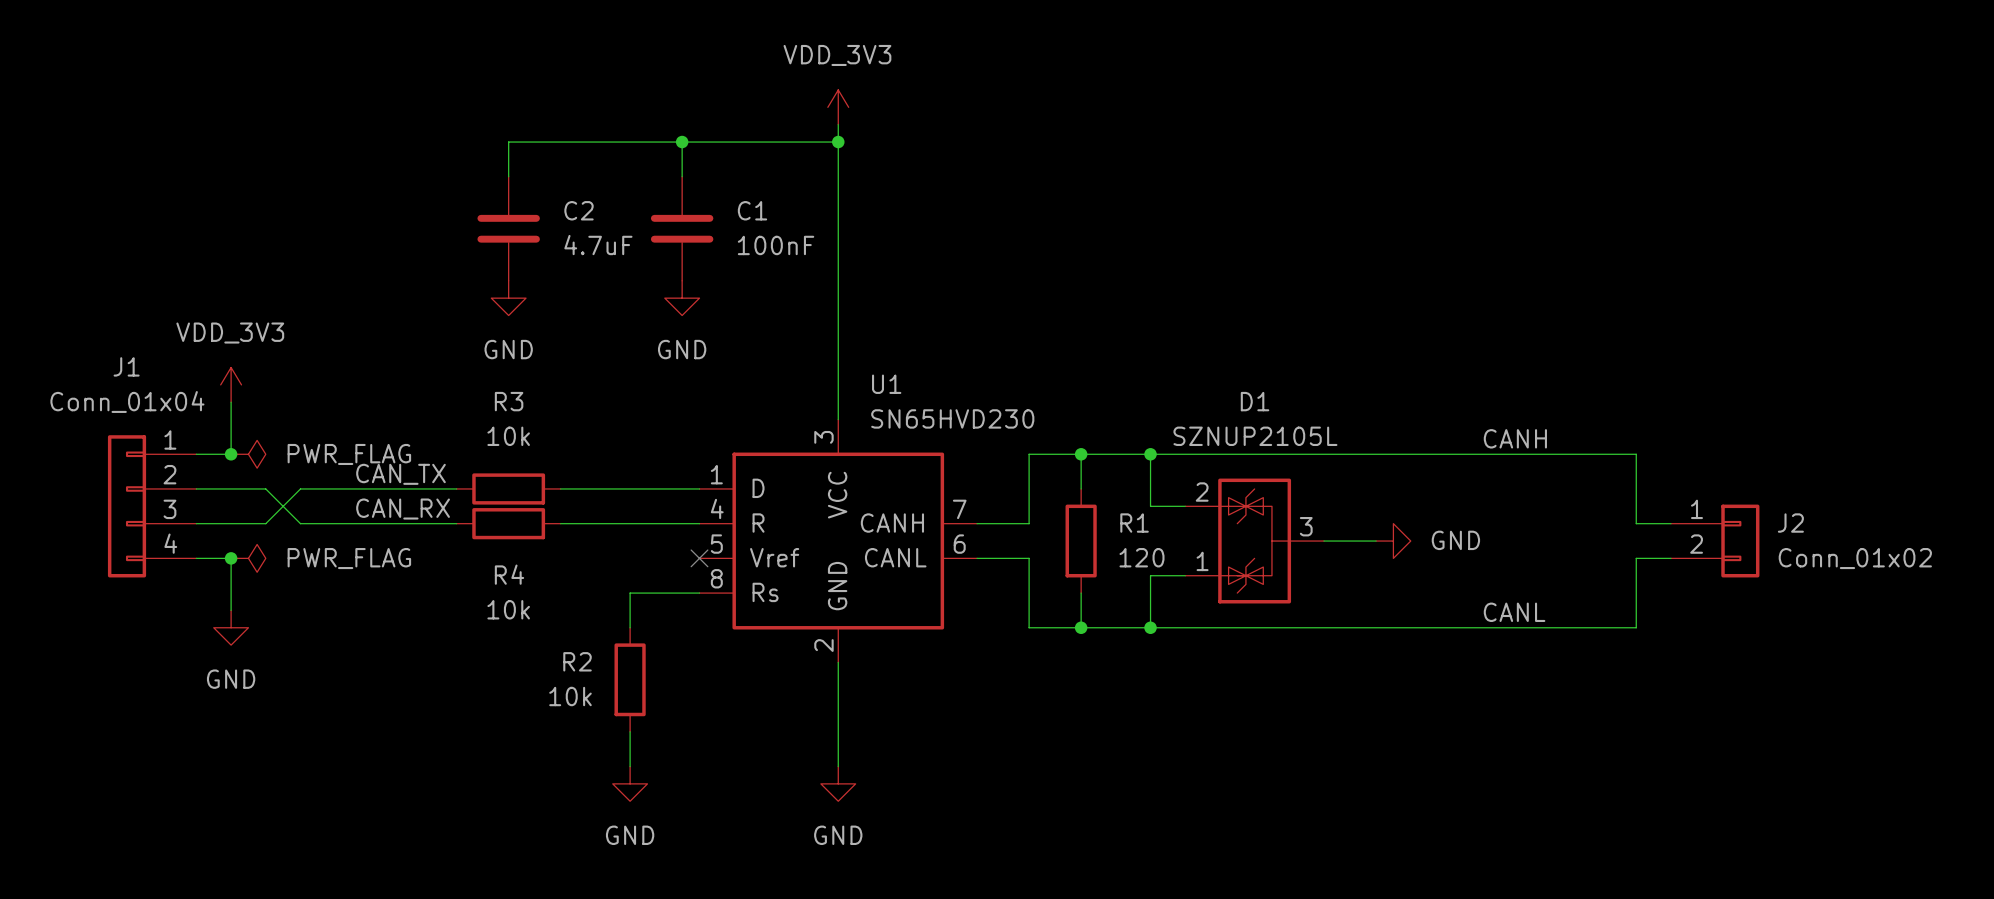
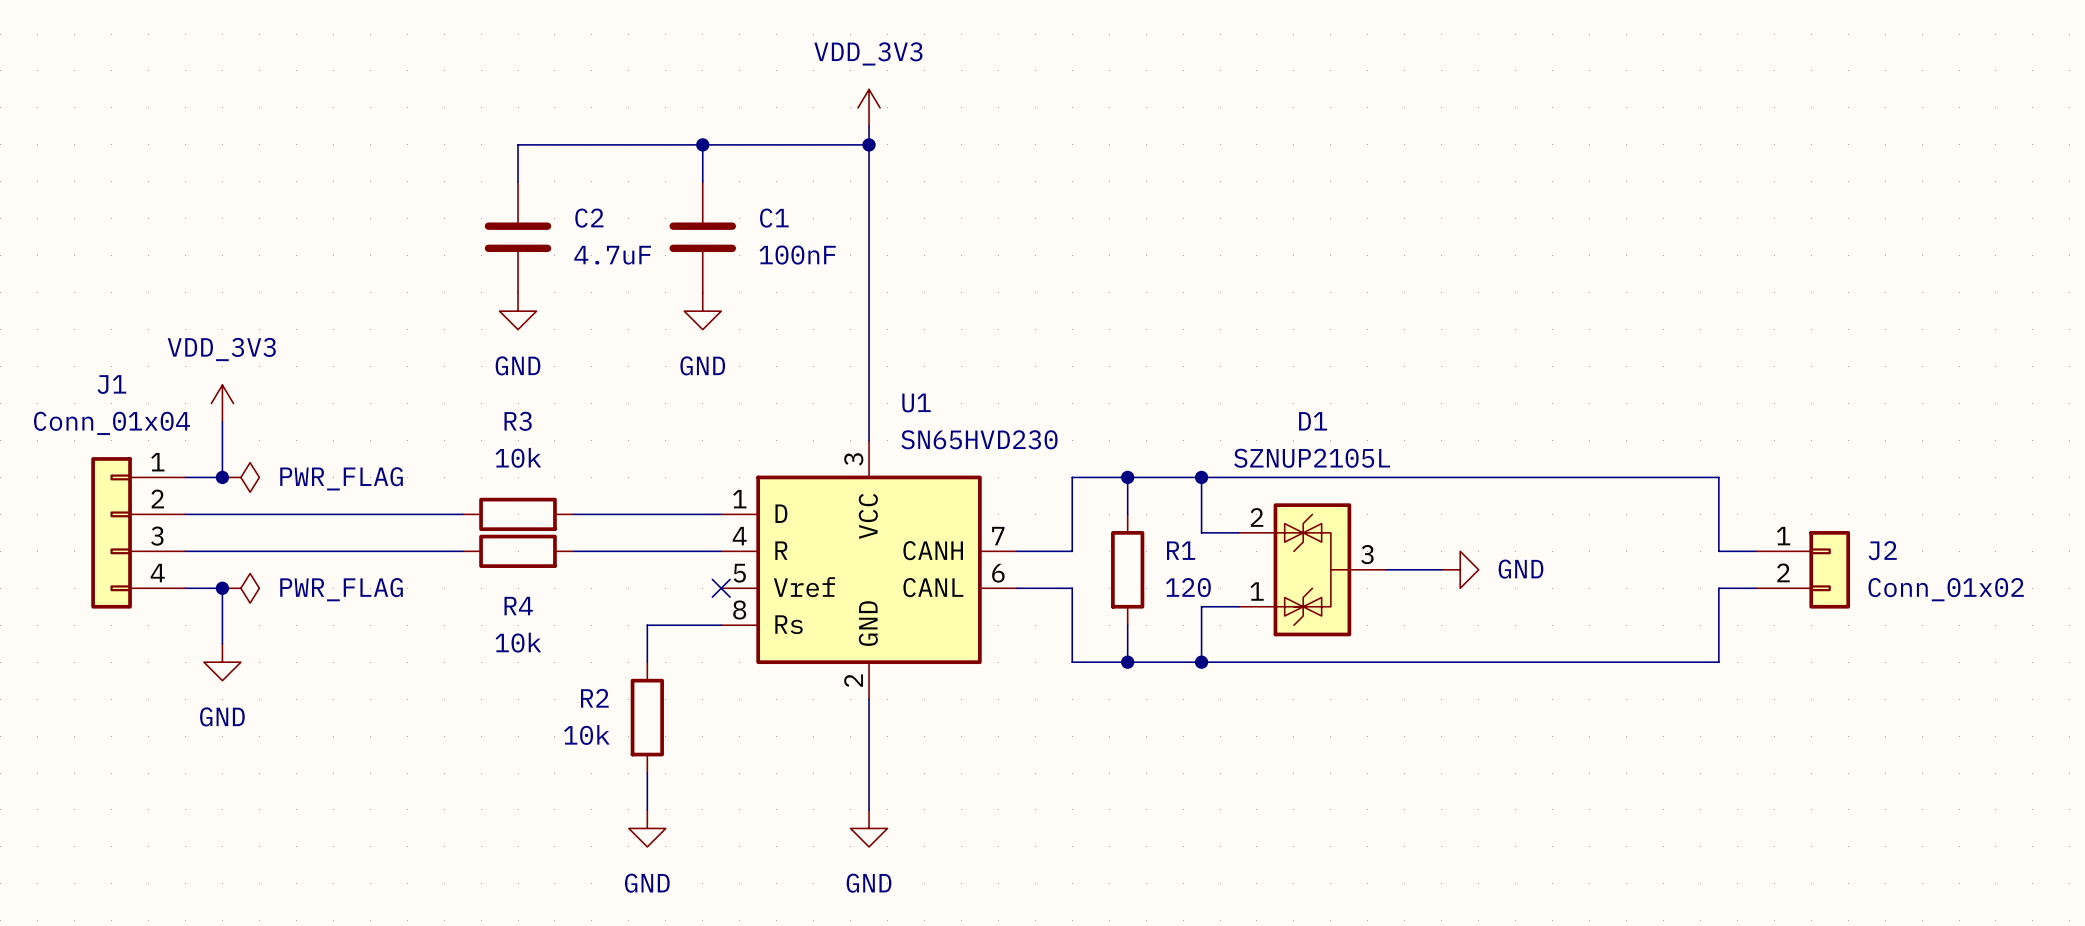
label: CANH (1515, 438) -> none
label: CAN_TX (400, 474) -> none
wire: (265, 488) (300, 523) -> (259, 514) (296, 514)
wire: (300, 488) (265, 523) -> (296, 551) (259, 551)
label: CAN_RX (403, 509) -> none
label: CANL (1514, 612) -> none

